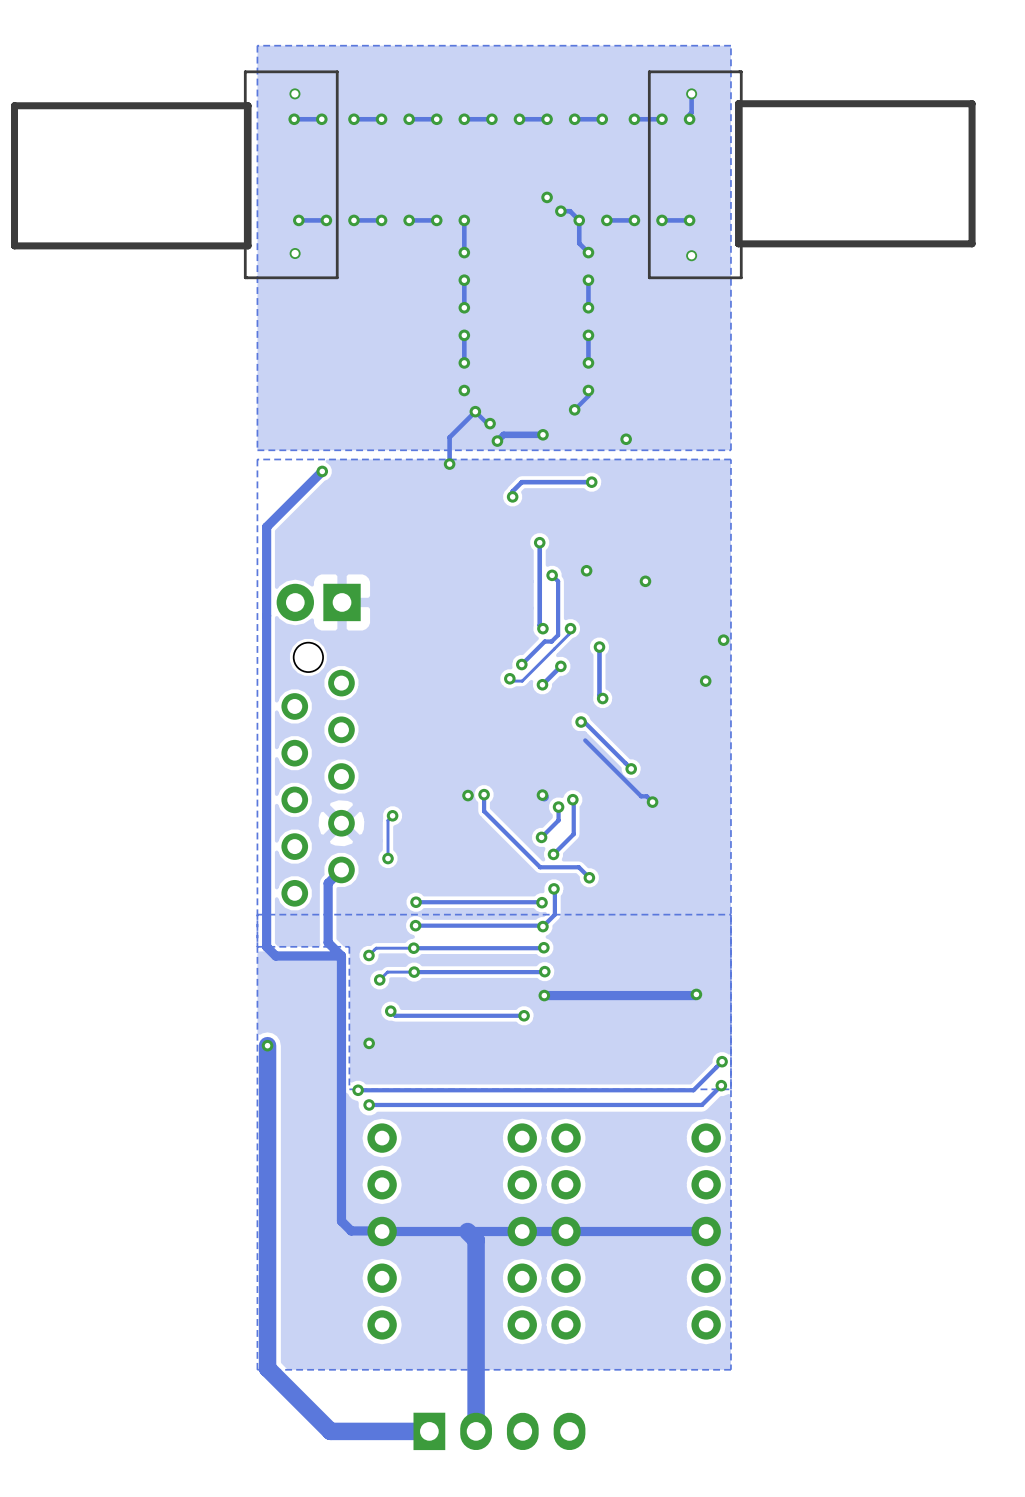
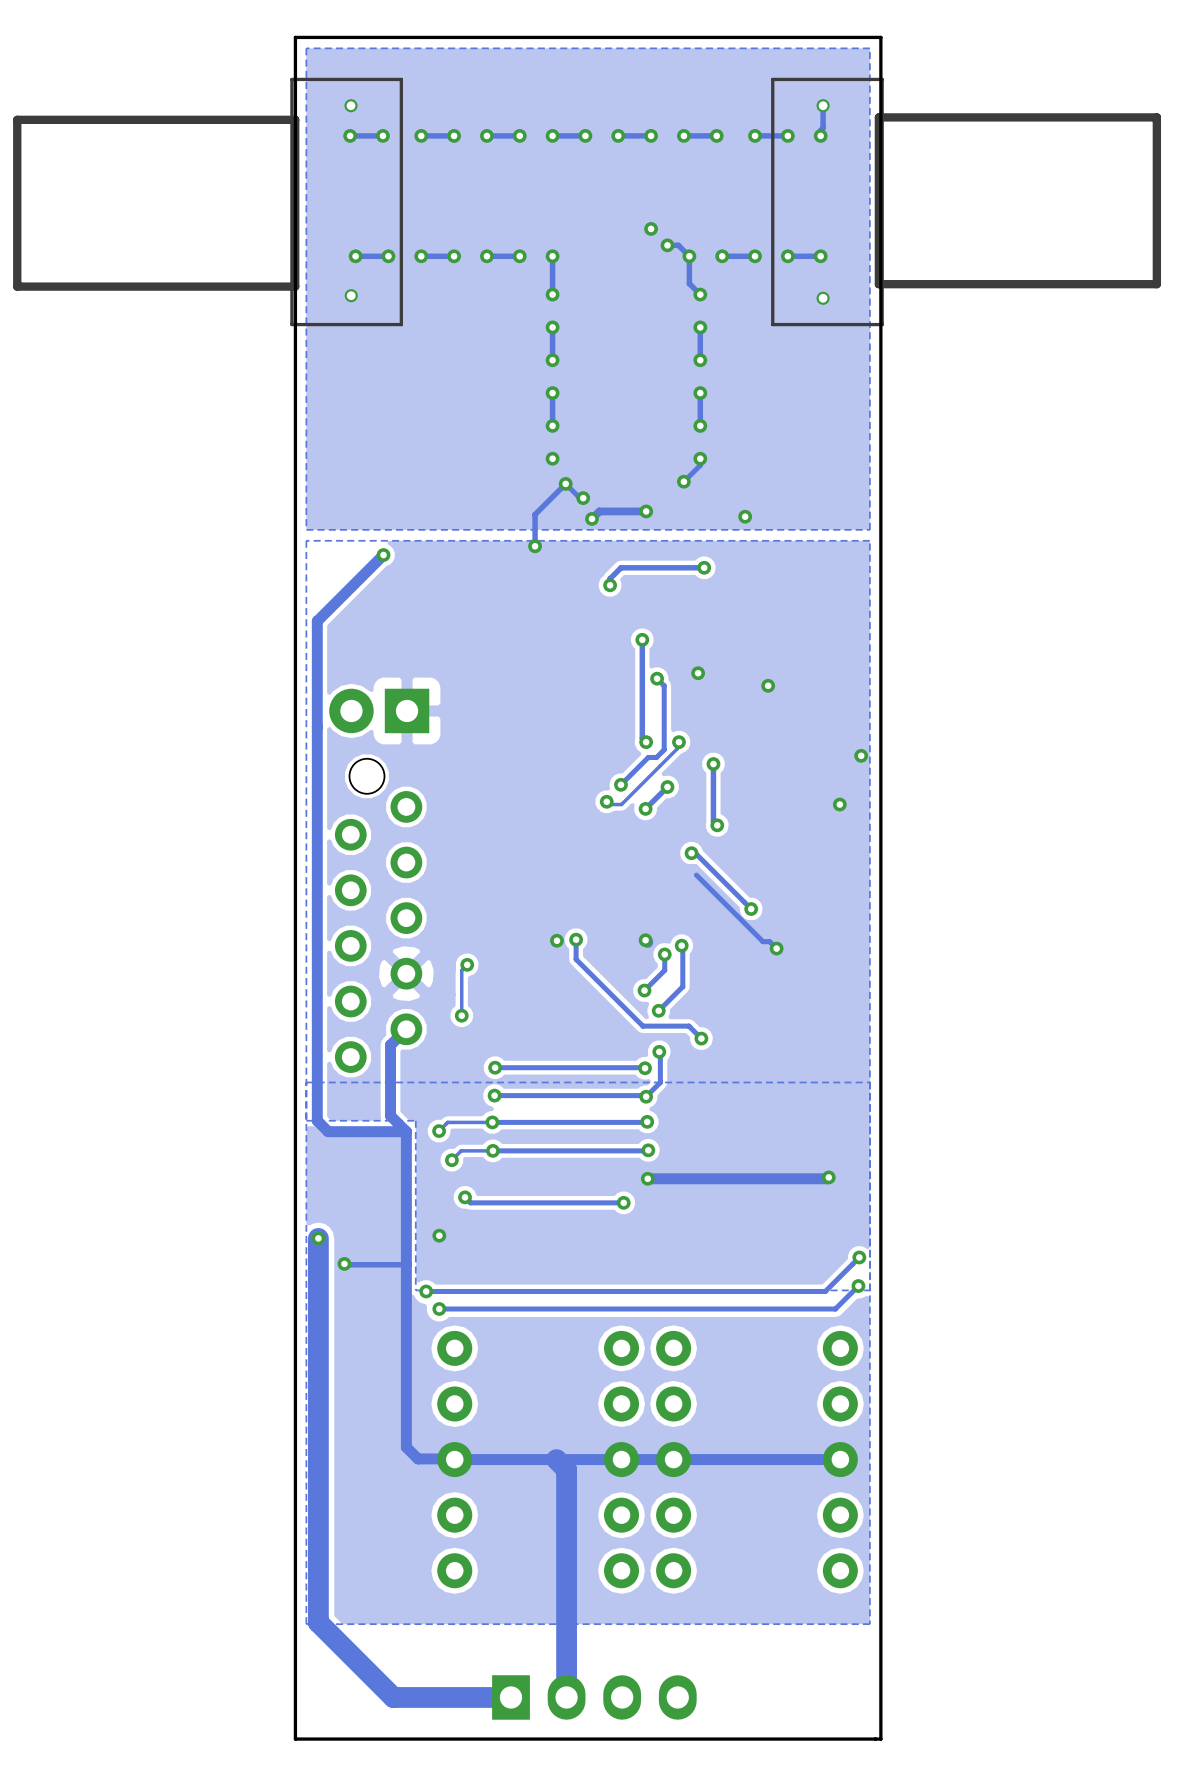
board edge: none -> (880, 37) (880, 1739) (295, 1739) (295, 37) (880, 37)
track: none -> (344, 1263) (406, 1264)
via: none -> (344, 1263)

